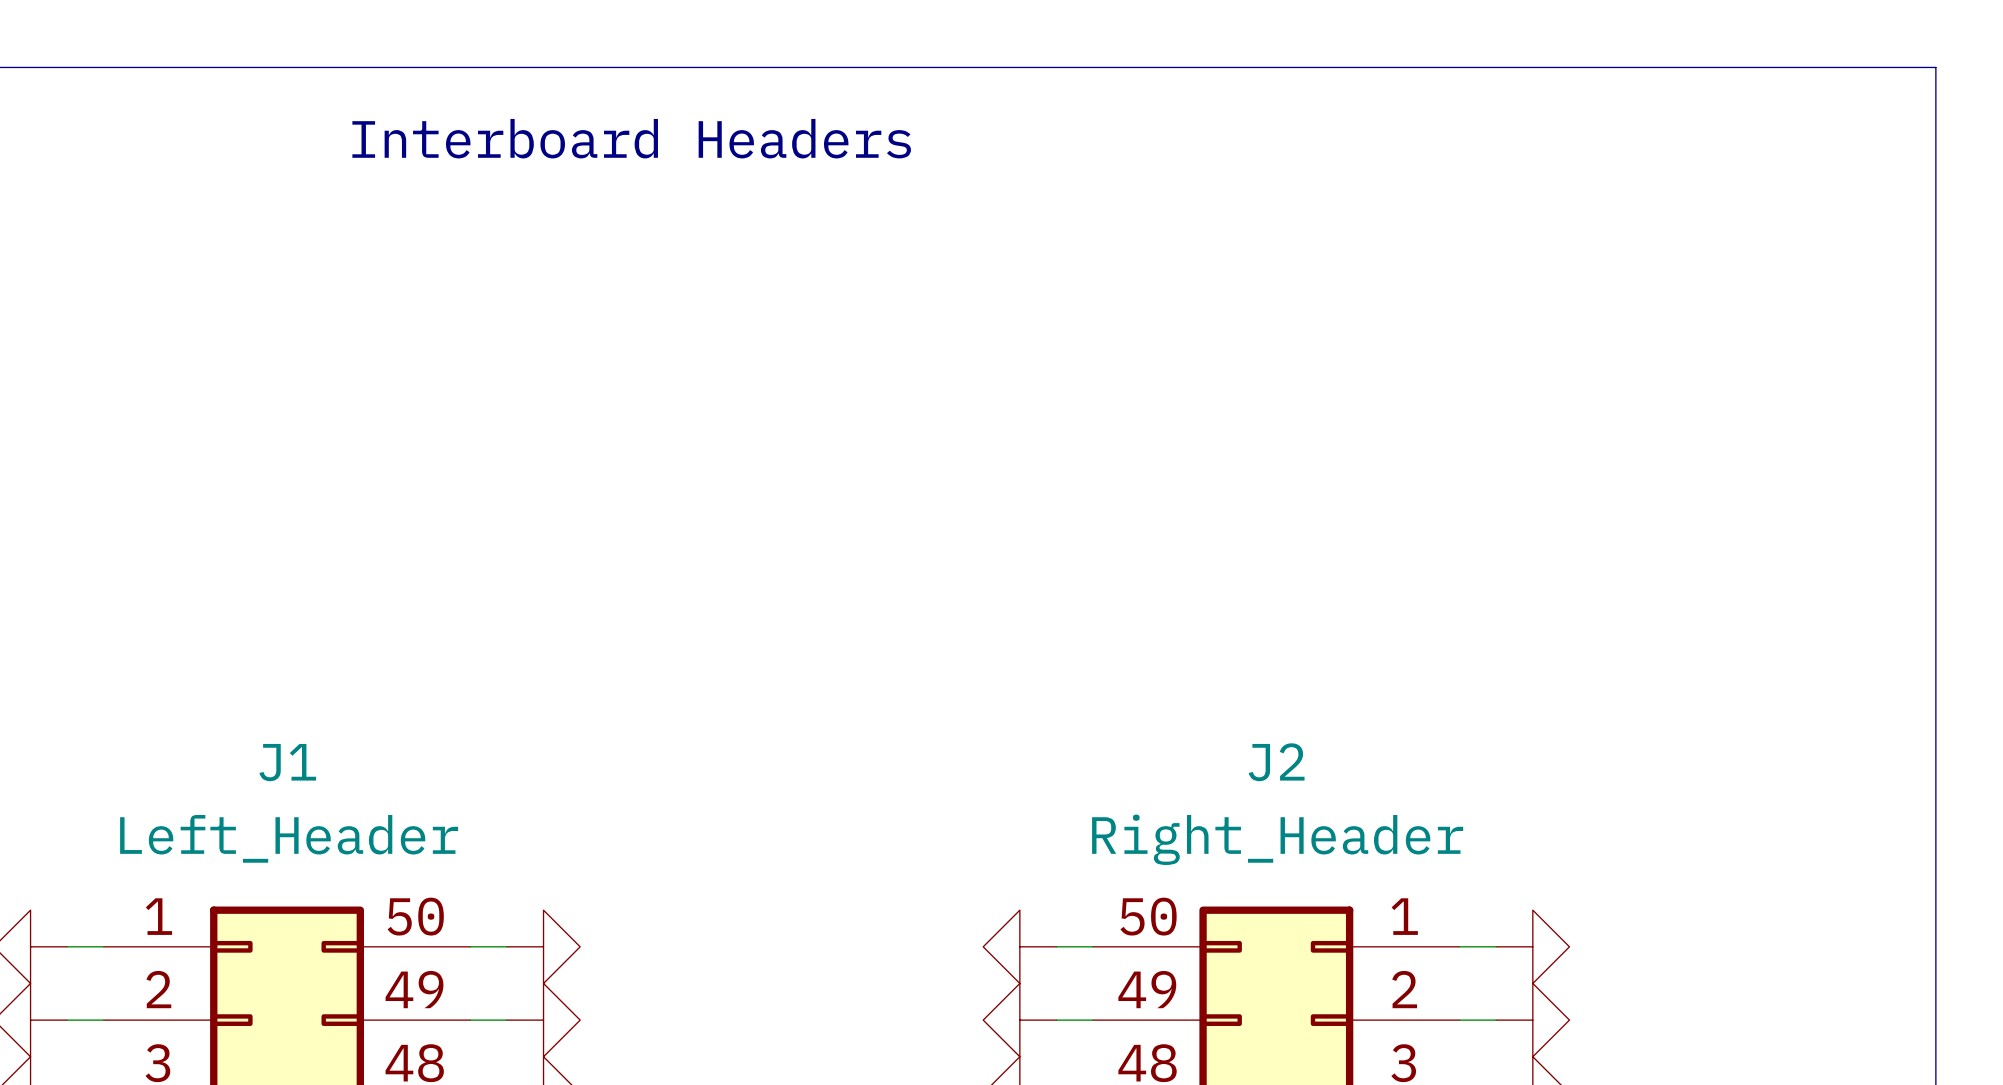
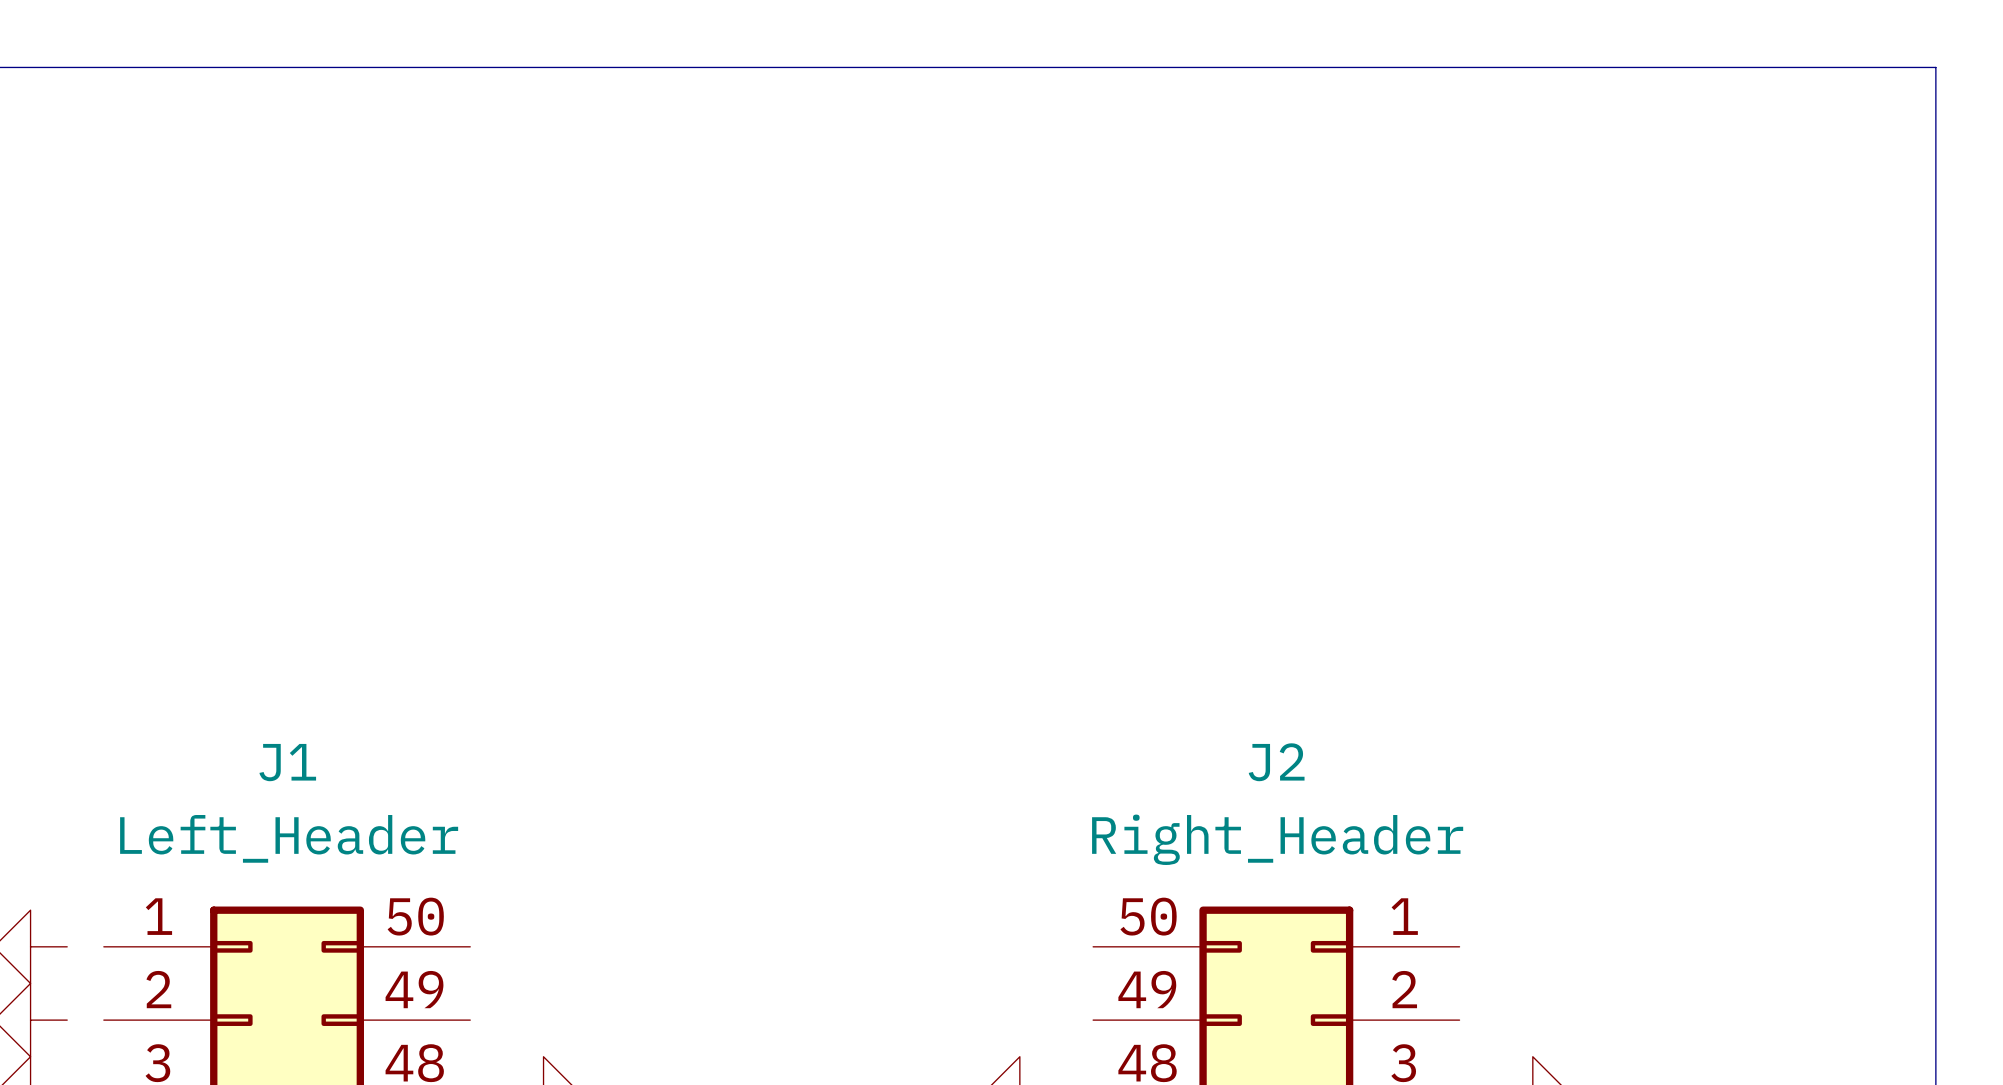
text: Interboard Headers (631, 138) -> none
wire: (67, 946) (103, 946) -> none
wire: (470, 946) (506, 946) -> none
power symbol: (543, 946) -> none
power symbol: (1019, 946) -> none
wire: (1056, 946) (1093, 946) -> none
wire: (1459, 946) (1496, 946) -> none
power symbol: (1532, 946) -> none
wire: (67, 1020) (103, 1020) -> none
wire: (470, 1020) (506, 1020) -> none
power symbol: (543, 1020) -> none
power symbol: (1019, 1020) -> none
wire: (1056, 1020) (1093, 1020) -> none
wire: (1459, 1020) (1496, 1020) -> none
power symbol: (1532, 1020) -> none

